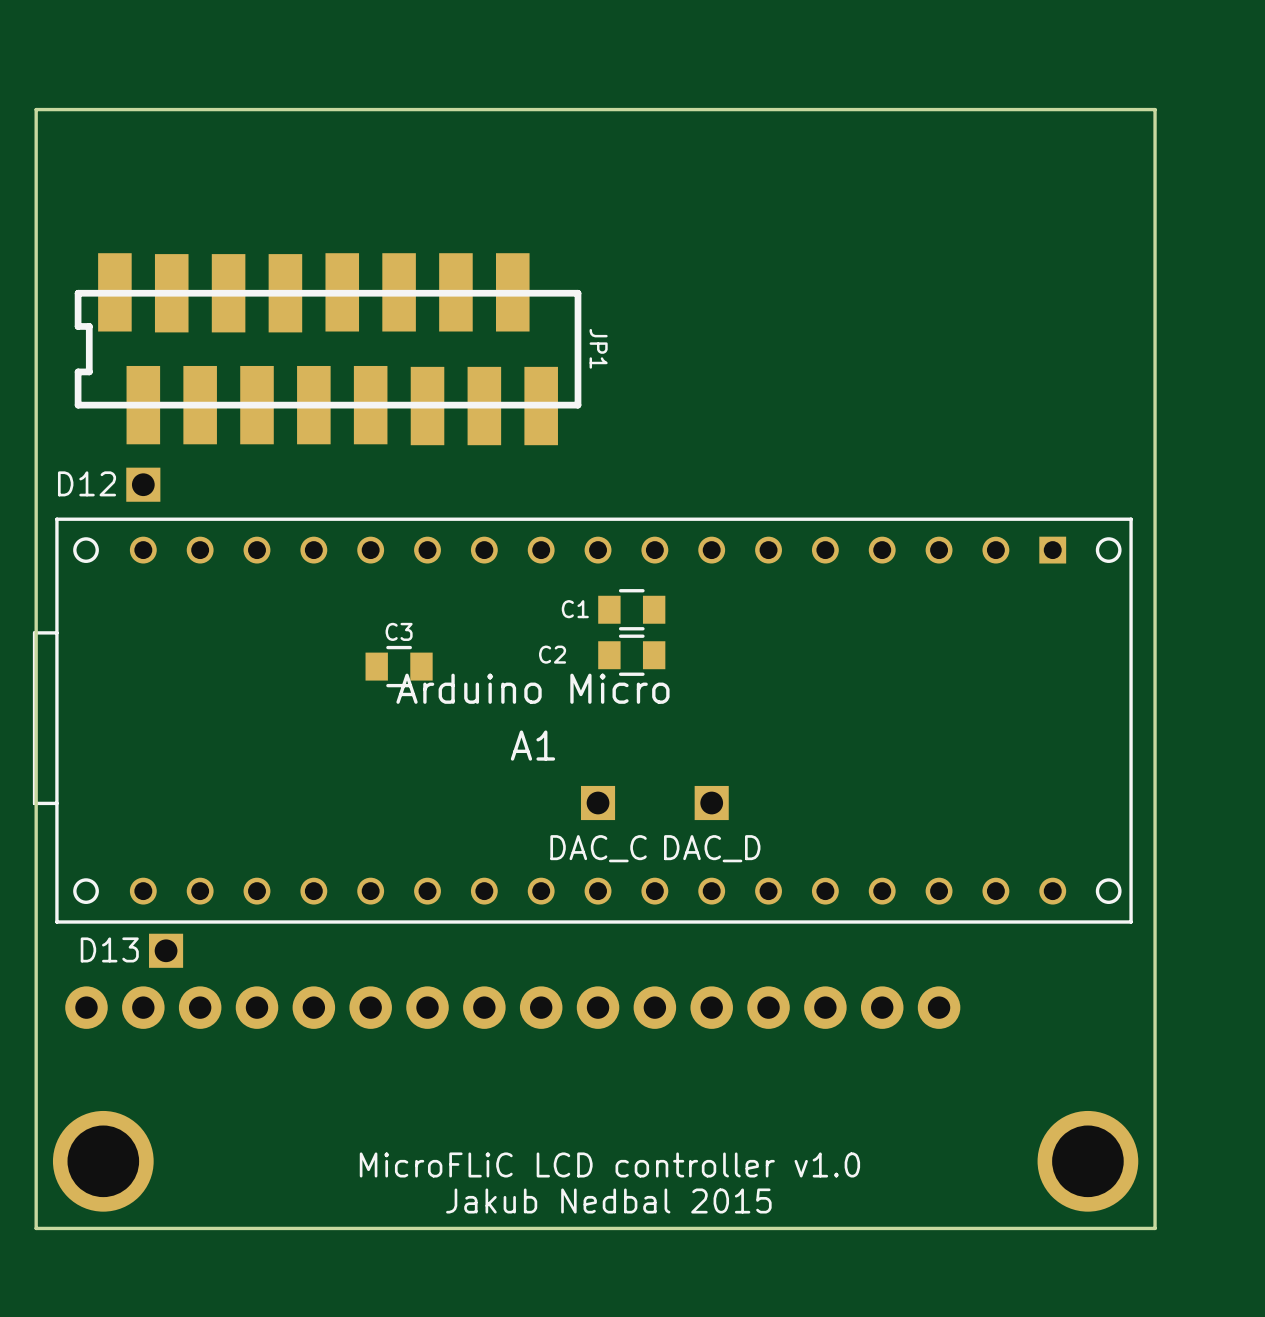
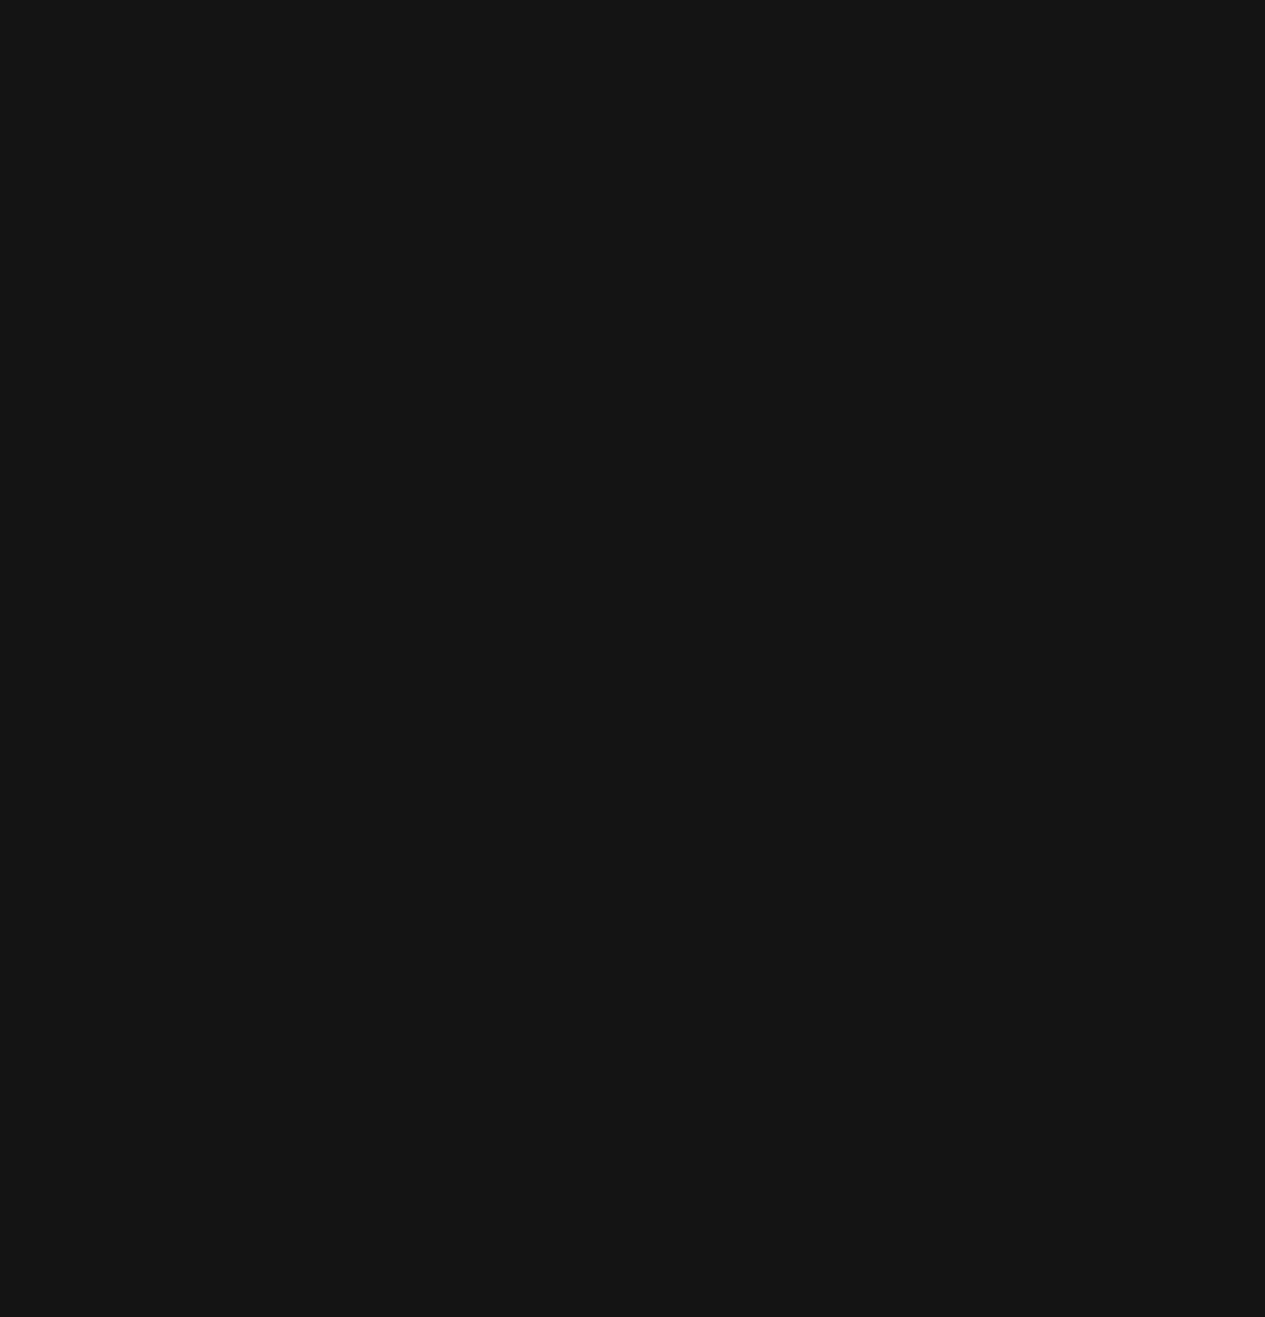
board edge: (1155, 109) (36, 109) (36, 1228) (1155, 1228) (1155, 109) -> none
JP1: (328, 349) -> none
text: D12 (87, 483) -> none
part: (143, 484) -> none
C1: (631, 609) -> none
C2: (631, 655) -> none
C3: (399, 666) -> none
A1: Arduino Micro (582, 720) -> none
part: (598, 803) -> none
part: (711, 803) -> none
text: DAC_C (598, 848) -> none
text: DAC_D (712, 848) -> none
text: D13 (109, 949) -> none
part: (166, 950) -> none
part: (512, 1007) -> none
part: (103, 1161) -> none
part: (1087, 1161) -> none
text: MicroFLiC LCD controller v1.0 (609, 1164) -> none
text: Jakub Nedbal 2015 (608, 1201) -> none

